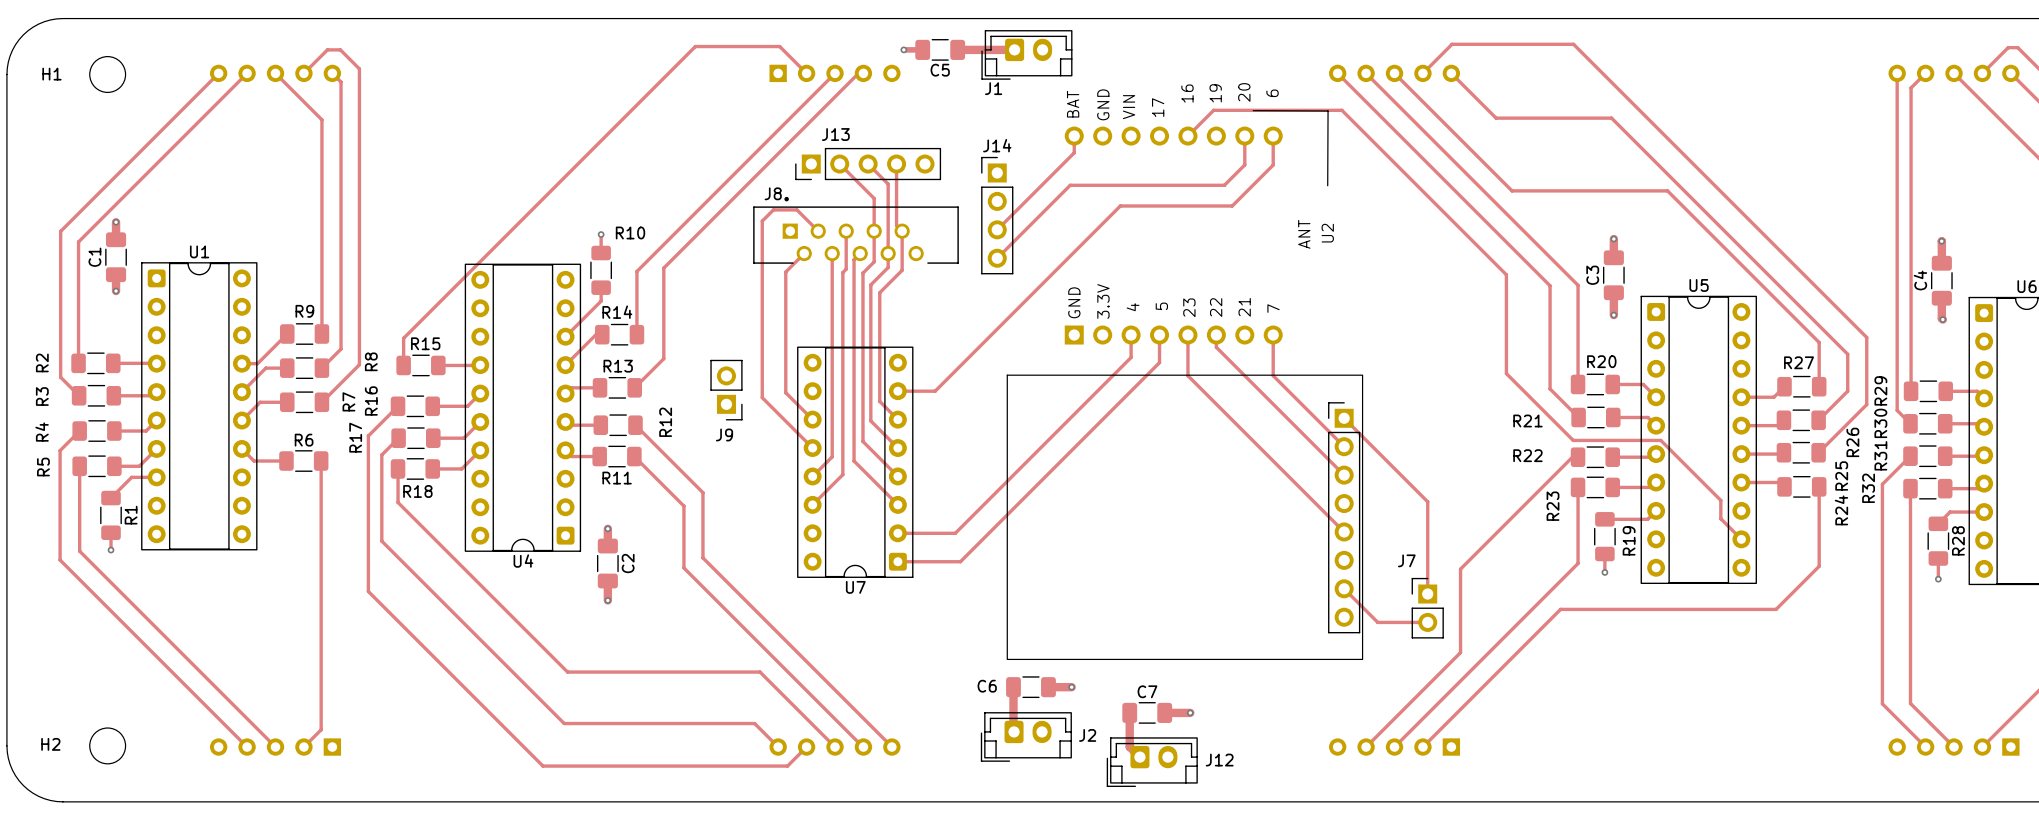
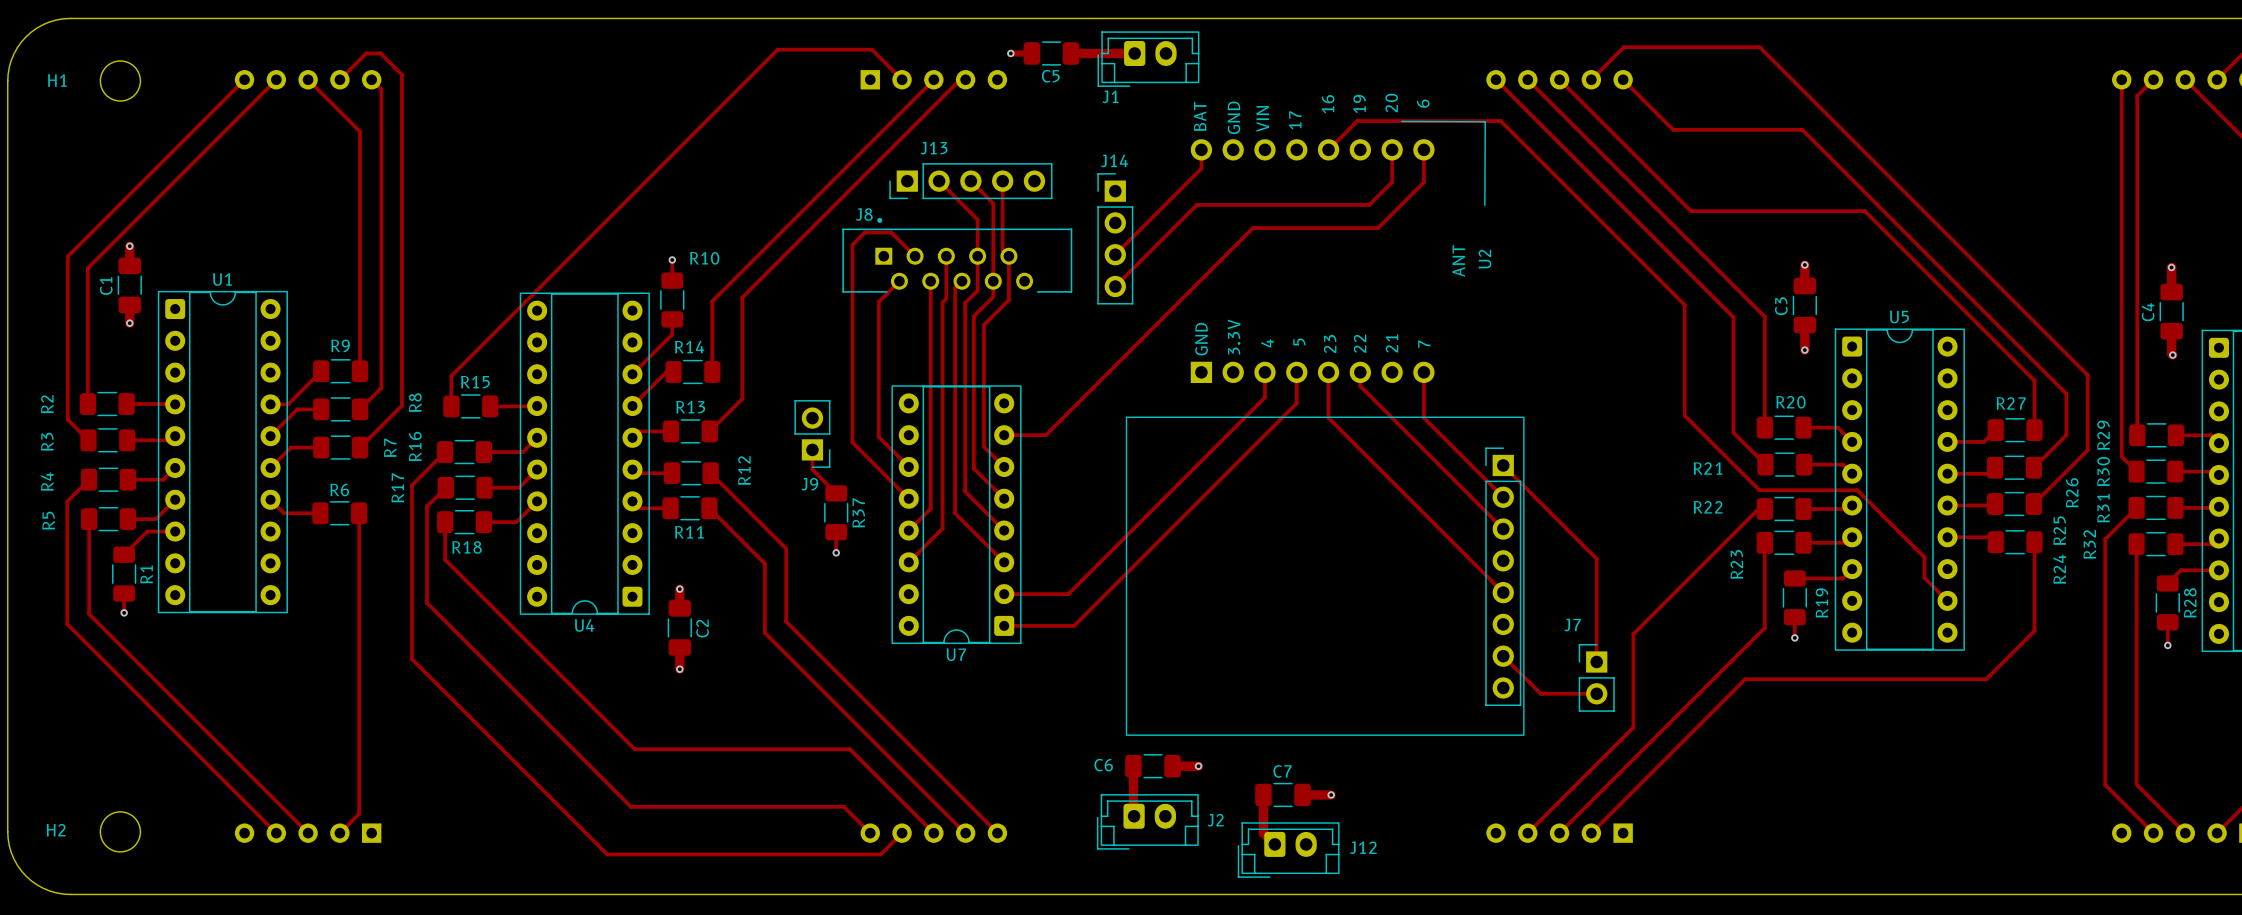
track: none -> (812, 449) (812, 469) (836, 493)
R37: none -> (836, 512)
track: none -> (836, 532) (836, 552)
via: none -> (836, 552)

